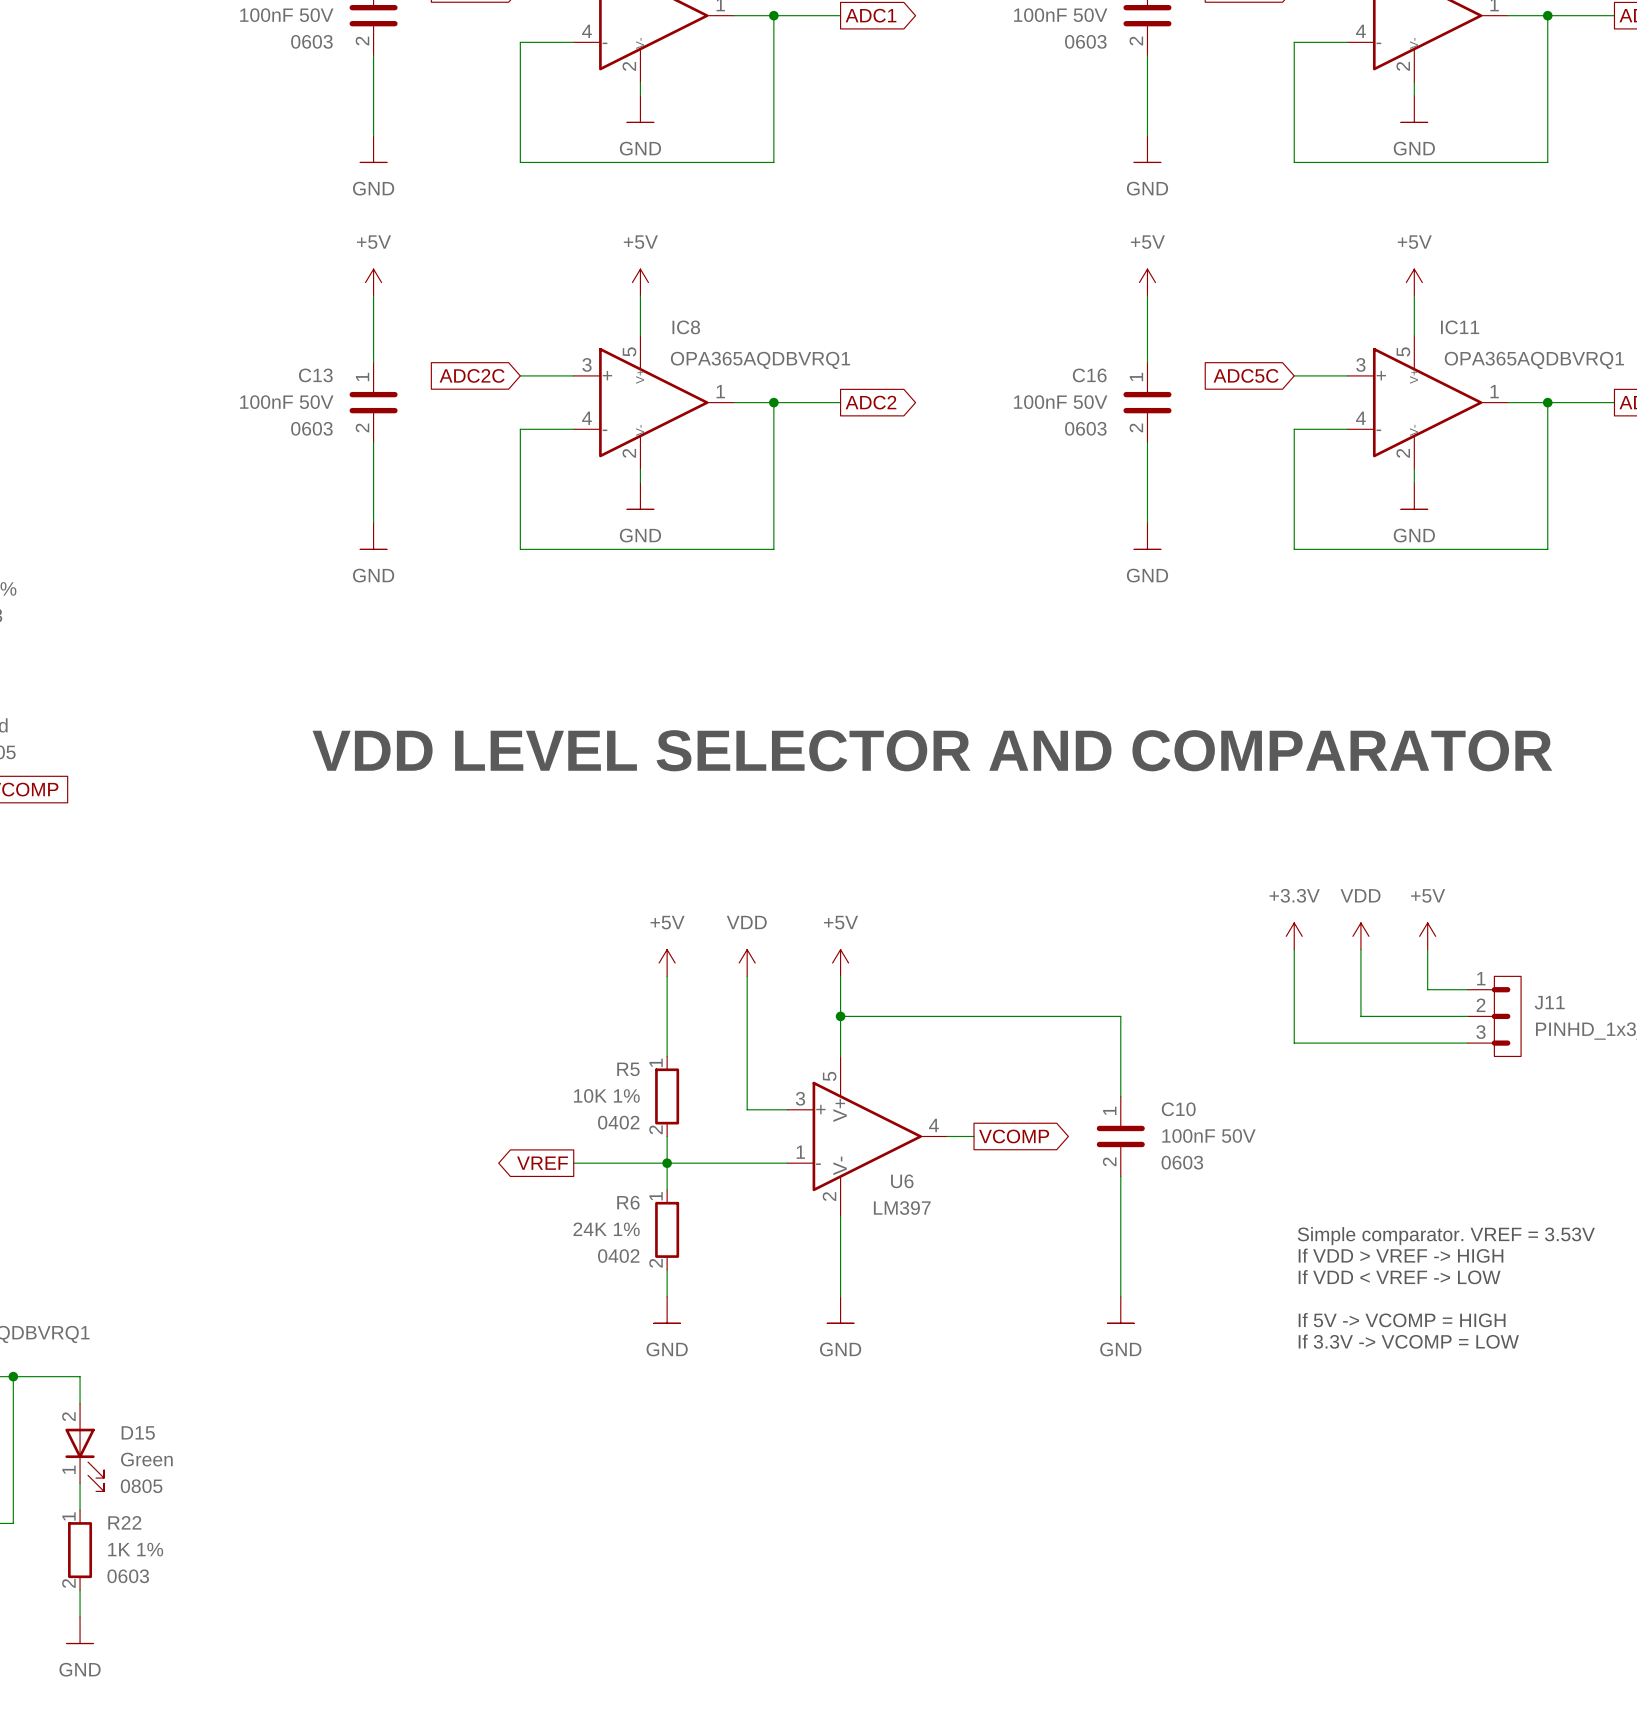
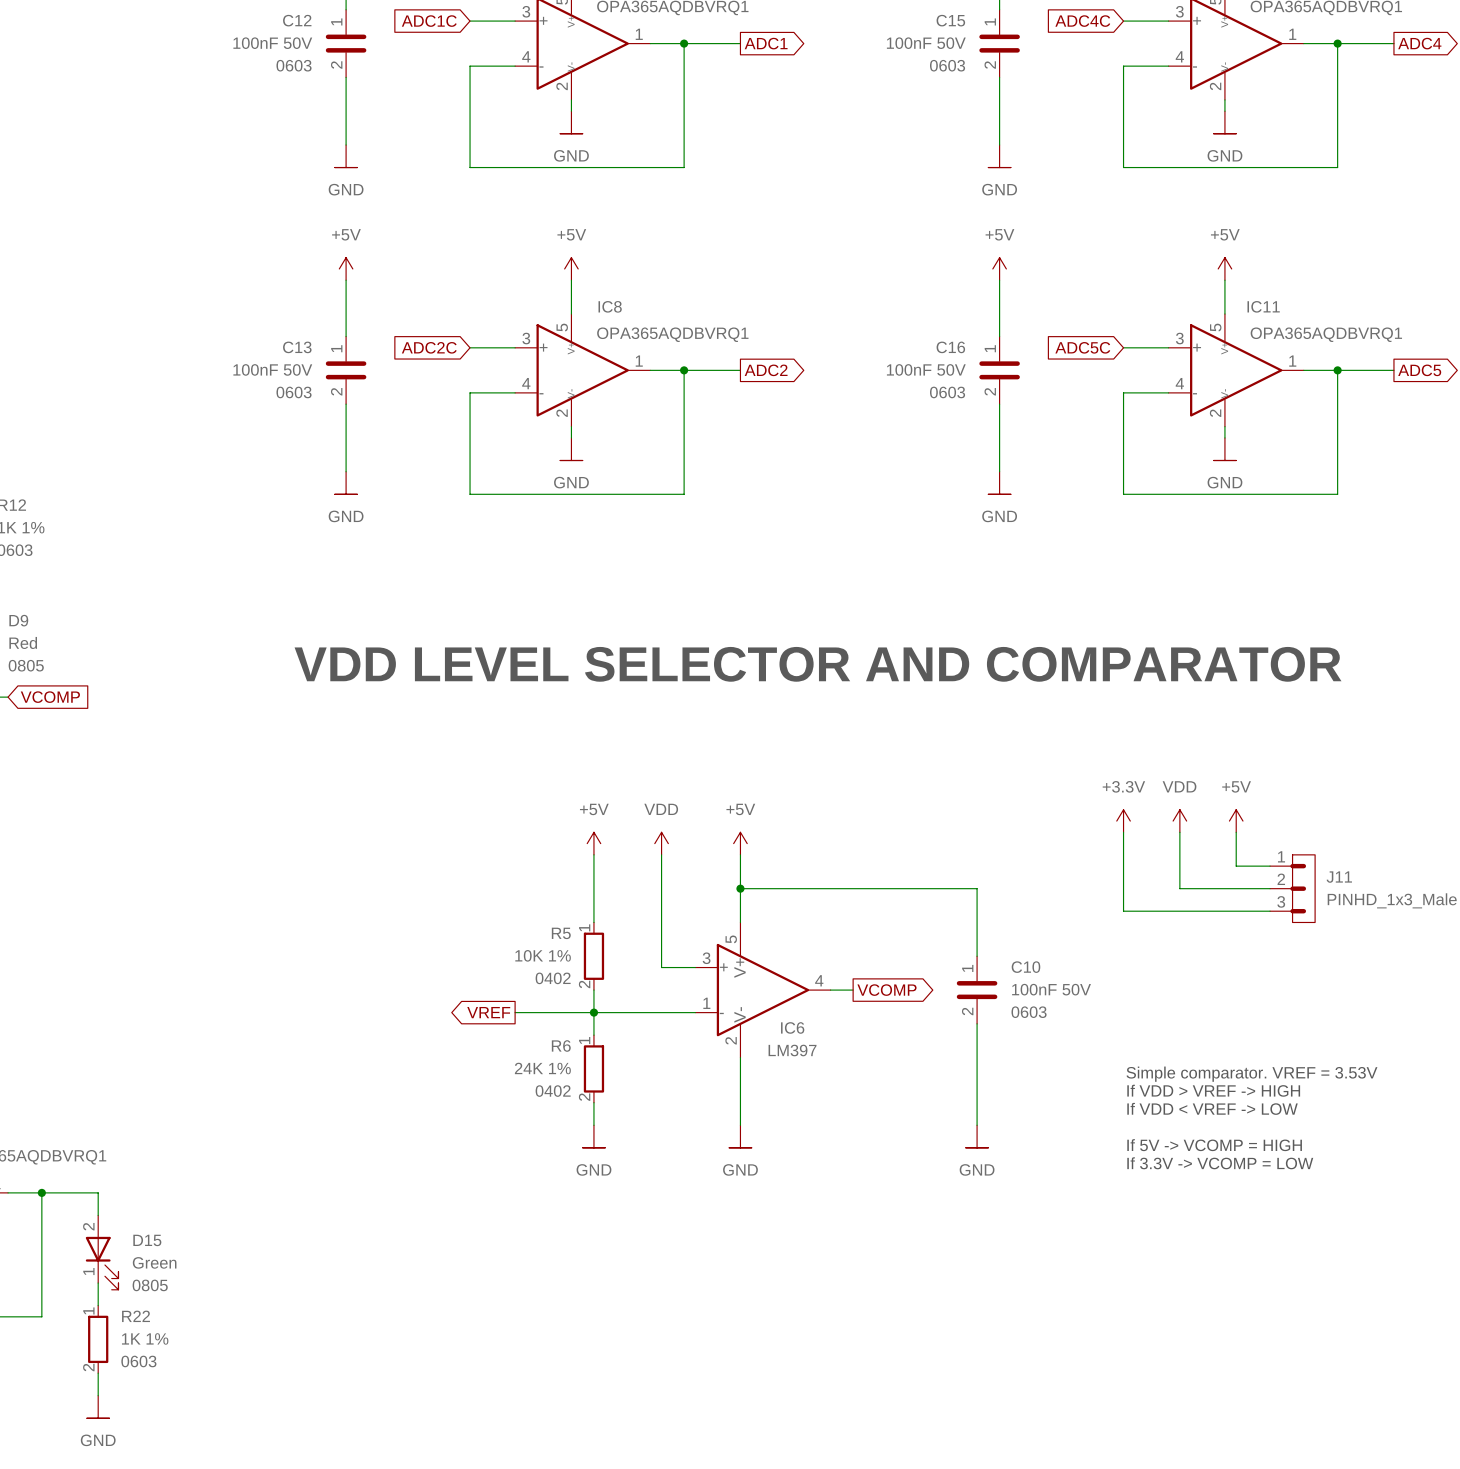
U6 name: U6 (902, 1181) -> IC6 (792, 1027)

